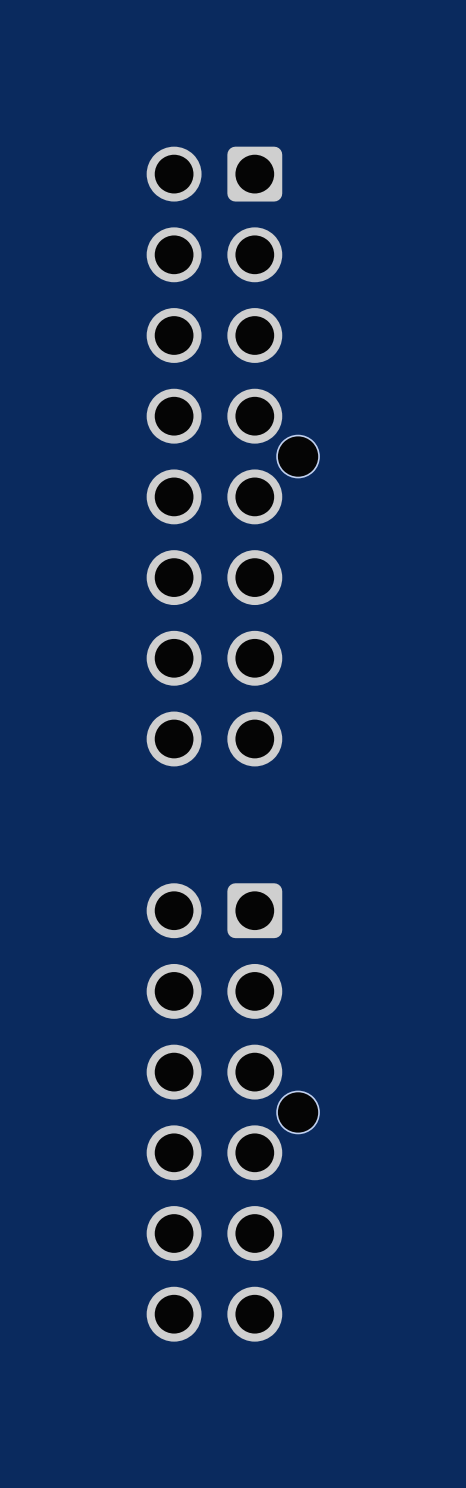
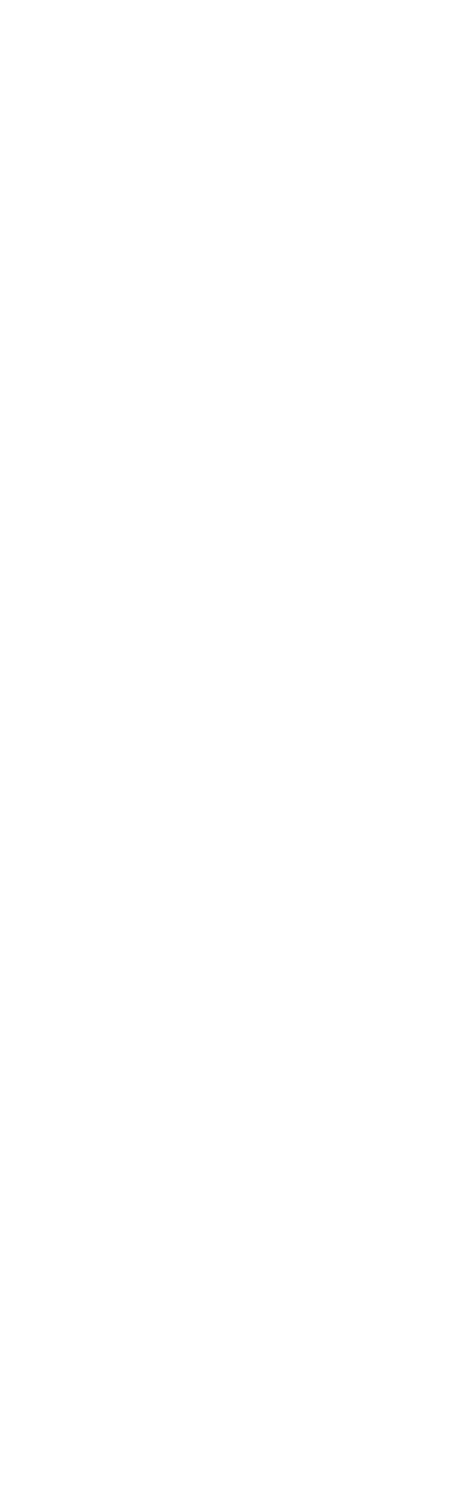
part: (232, 456) -> none
part: (232, 1112) -> none

